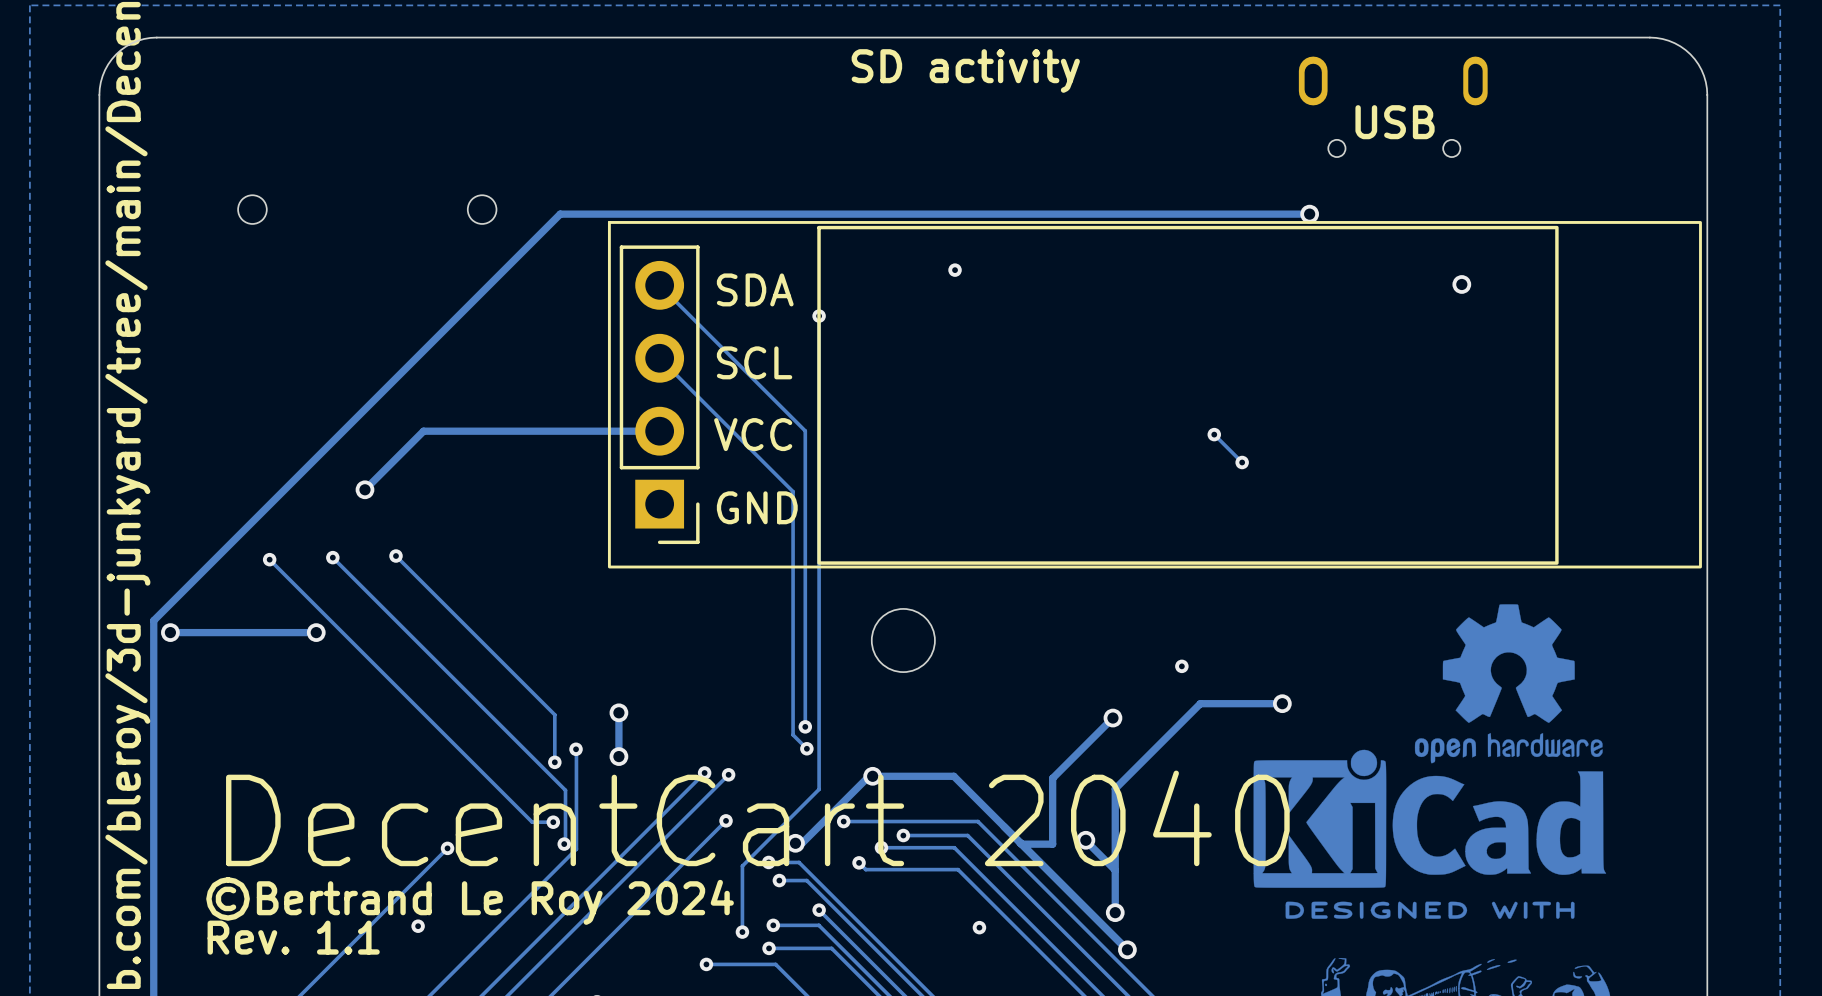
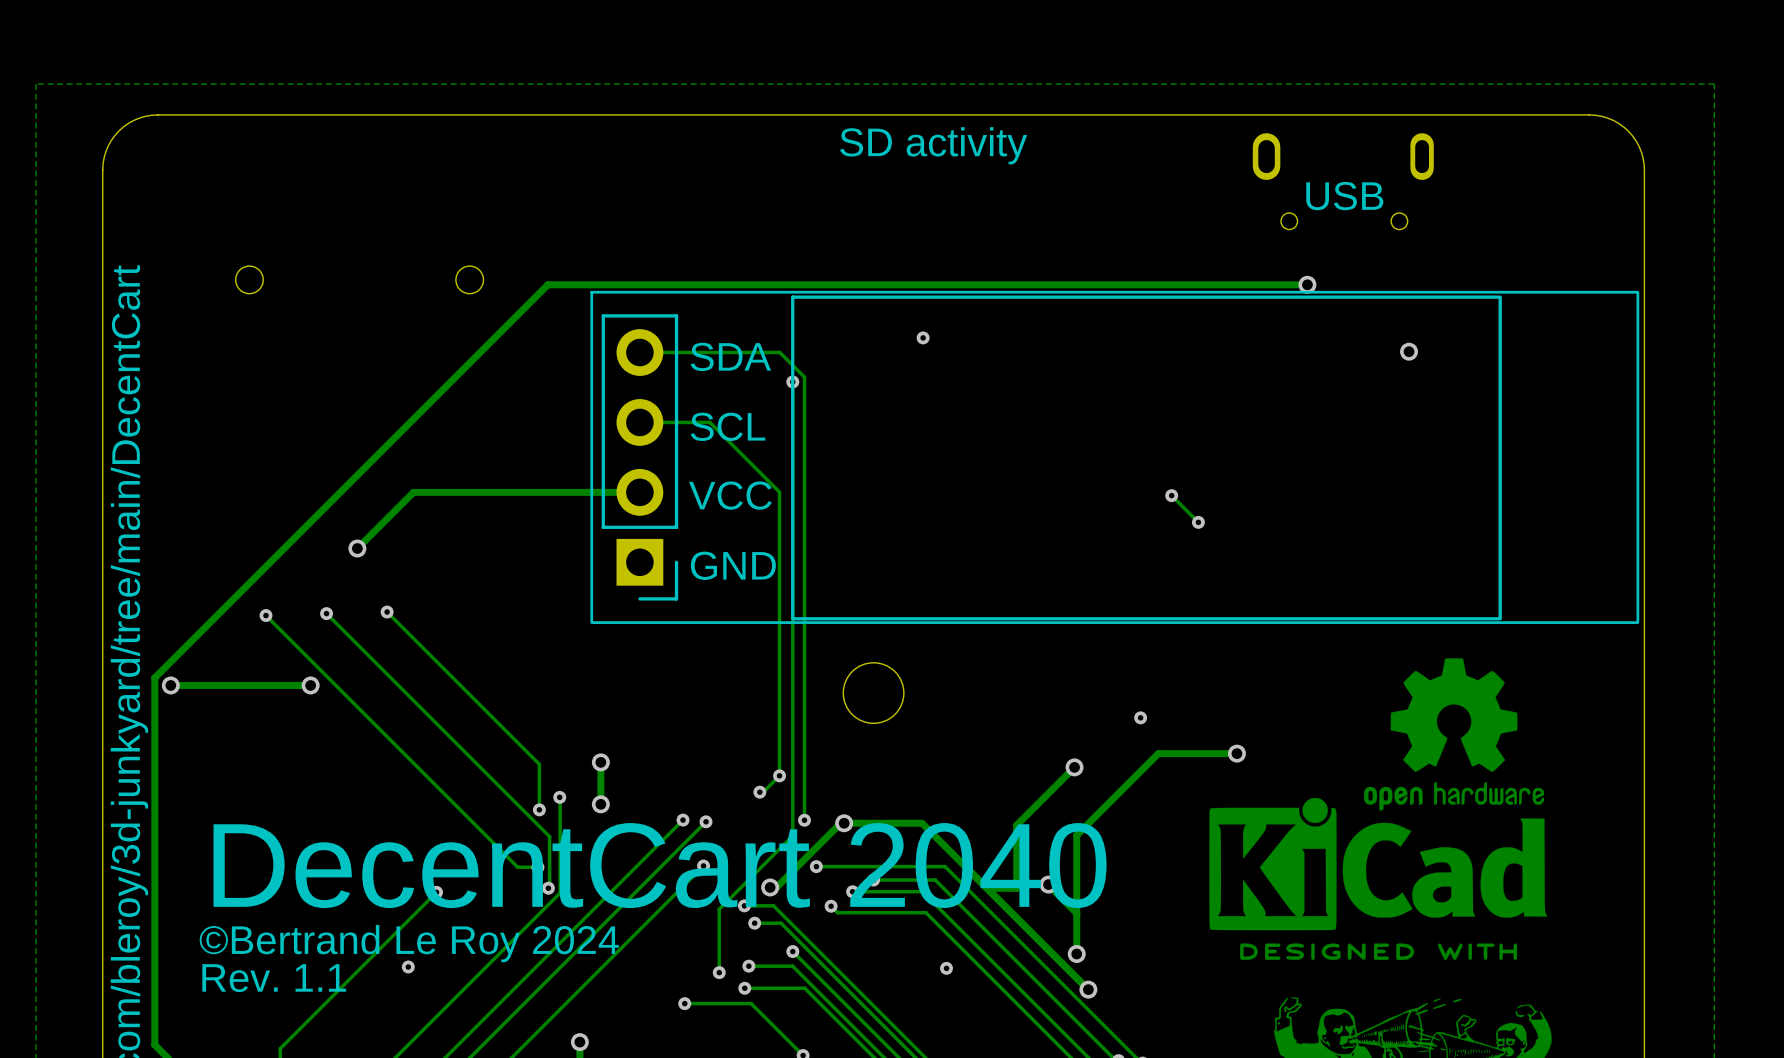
track: (1309, 214) (560, 214) (153, 620) (153, 624) -> (1307, 284) (547, 284) (154, 677)
via position: (1309, 214) -> (1307, 284)
track: (659, 285) (732, 358) -> (639, 422) (709, 422)
track: none -> (639, 352) (779, 352) (804, 377) (804, 820)
track: (659, 358) (793, 491) (793, 734) (806, 748) -> none
track: none -> (779, 775) (763, 792) (759, 792)
via: none -> (759, 792)
via: (806, 748) -> none
via: none -> (804, 820)

